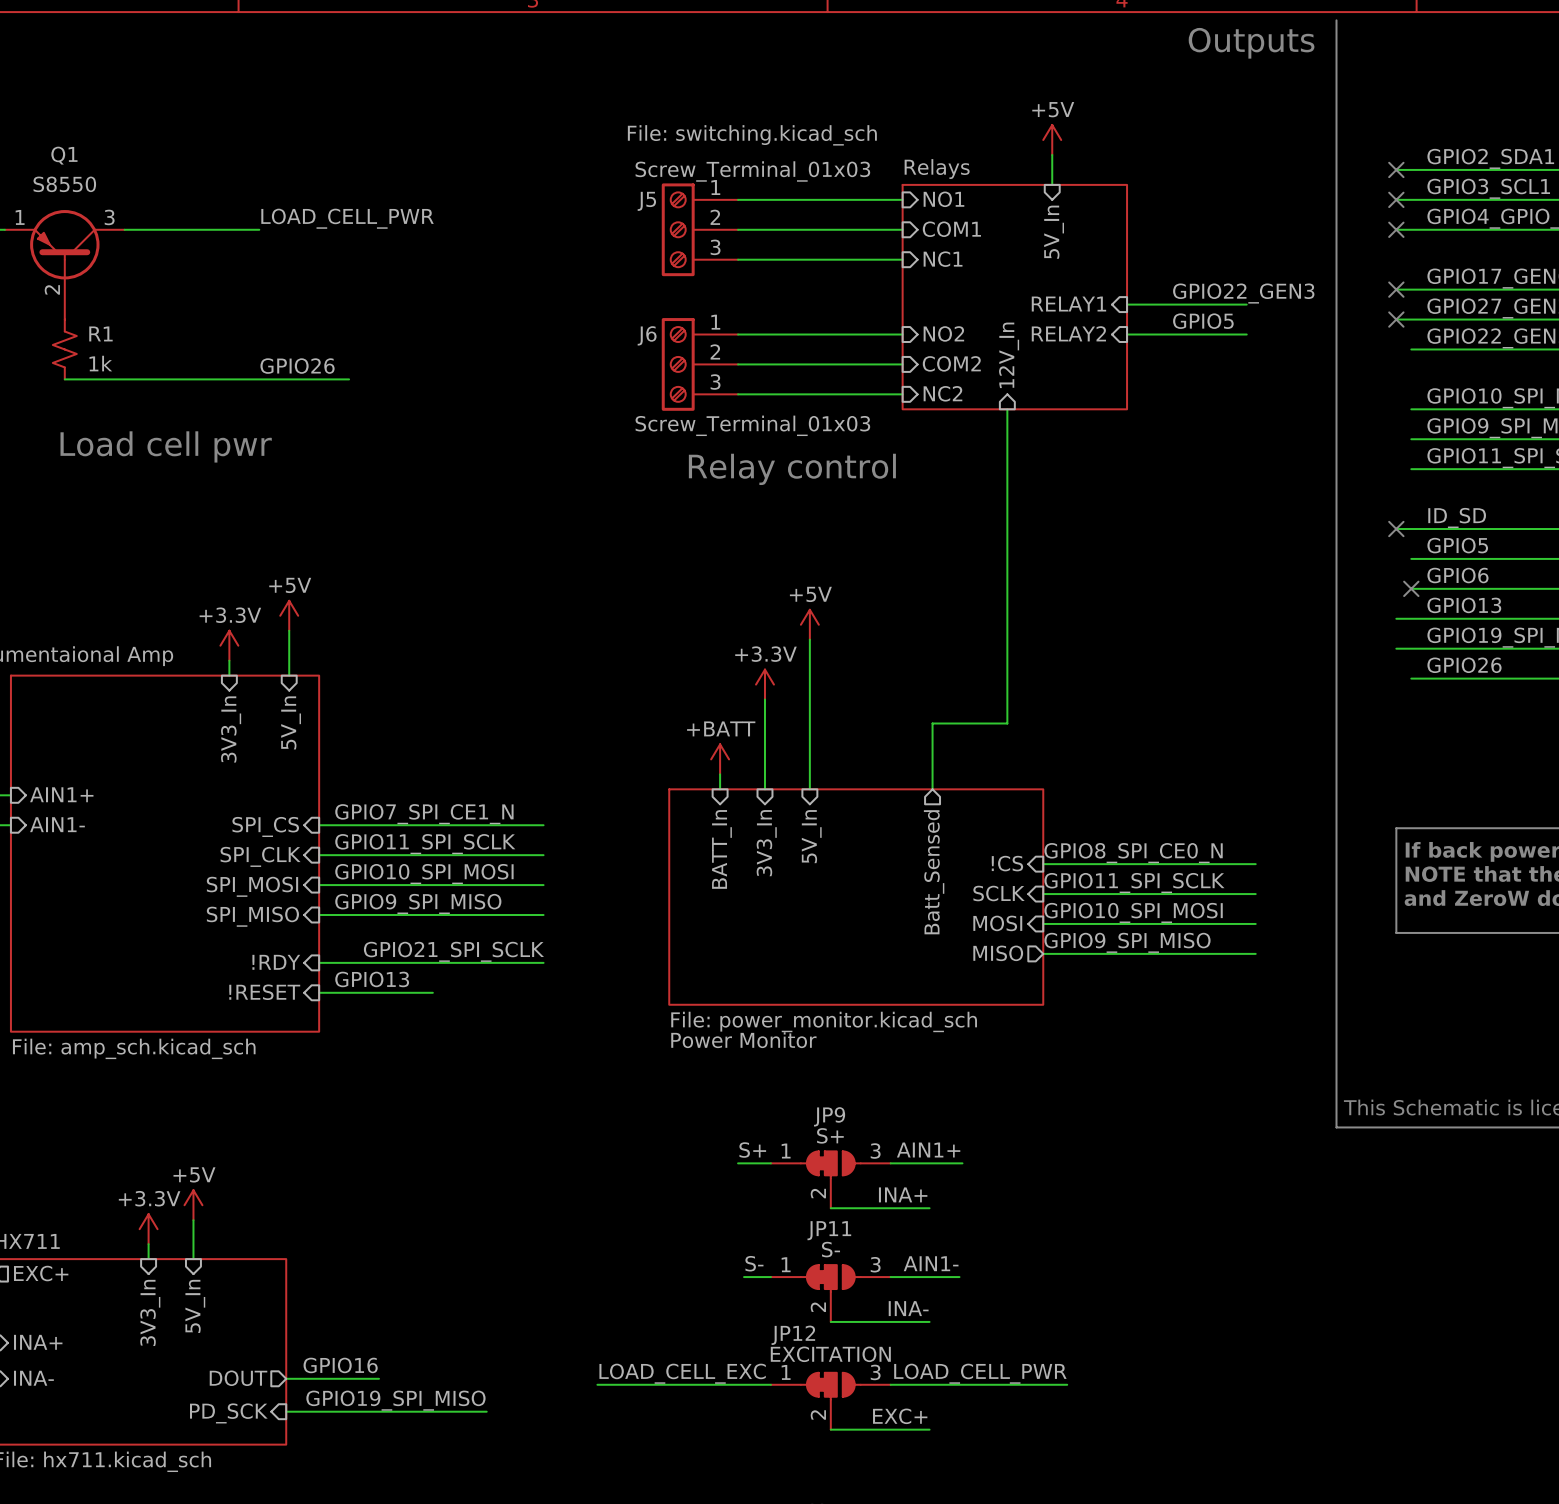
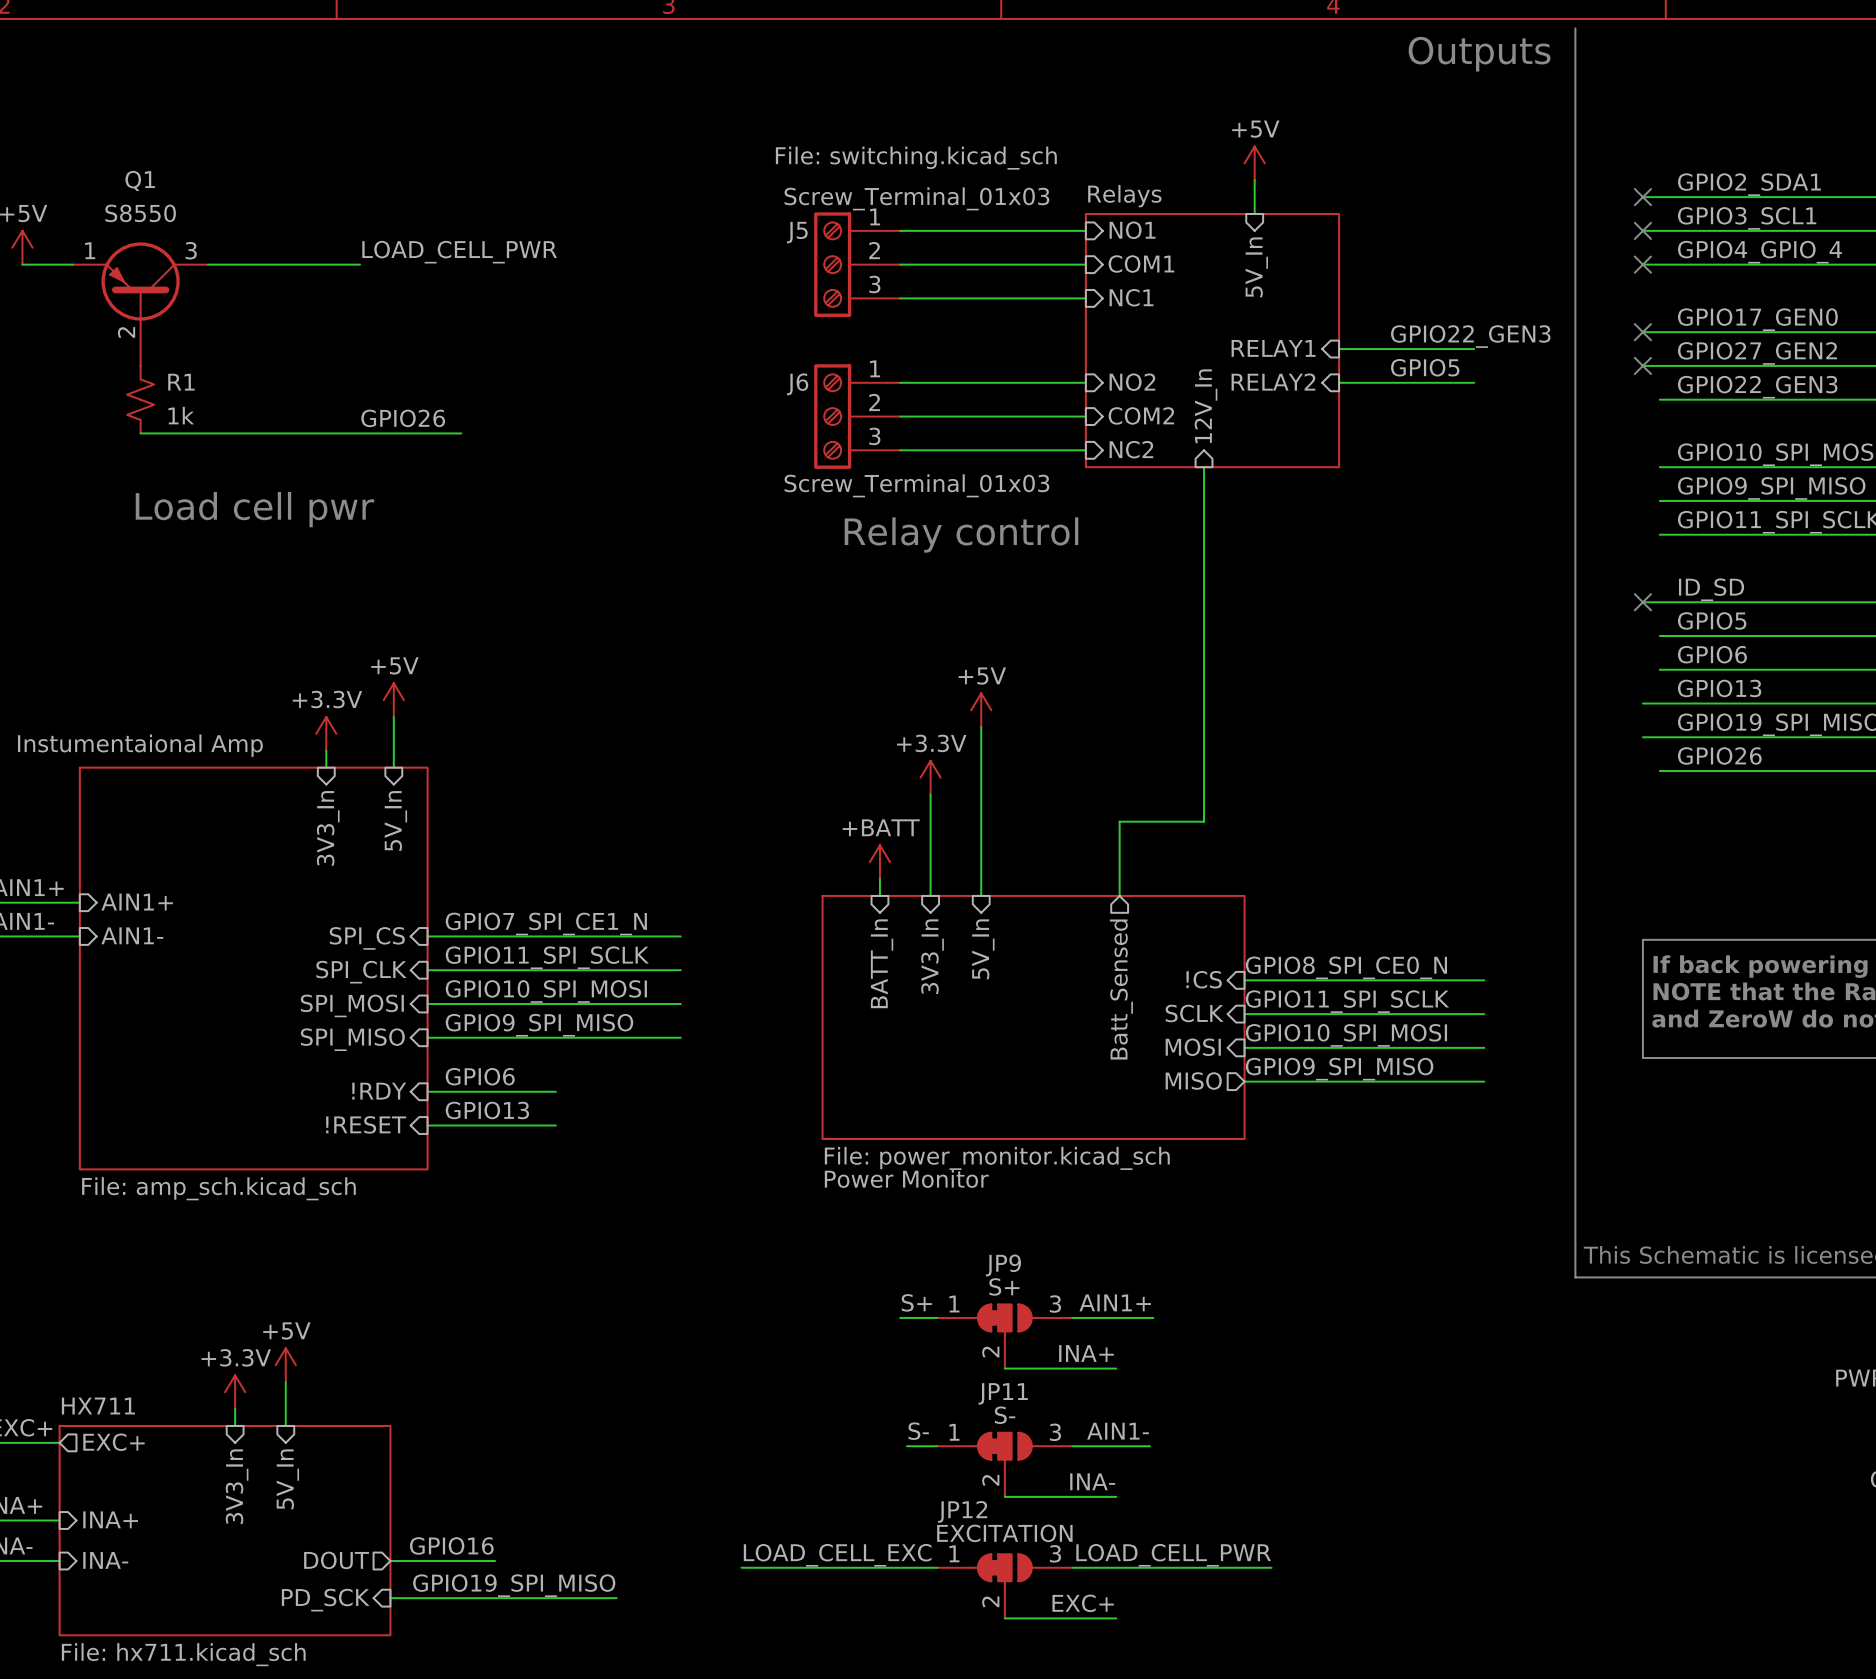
no-connect mark: (1411, 588) -> none
label: none -> GPIO6 (480, 1076)
label: GPIO21_SPI_SCLK (453, 951) -> none
wire: (432, 962) (543, 962) -> none

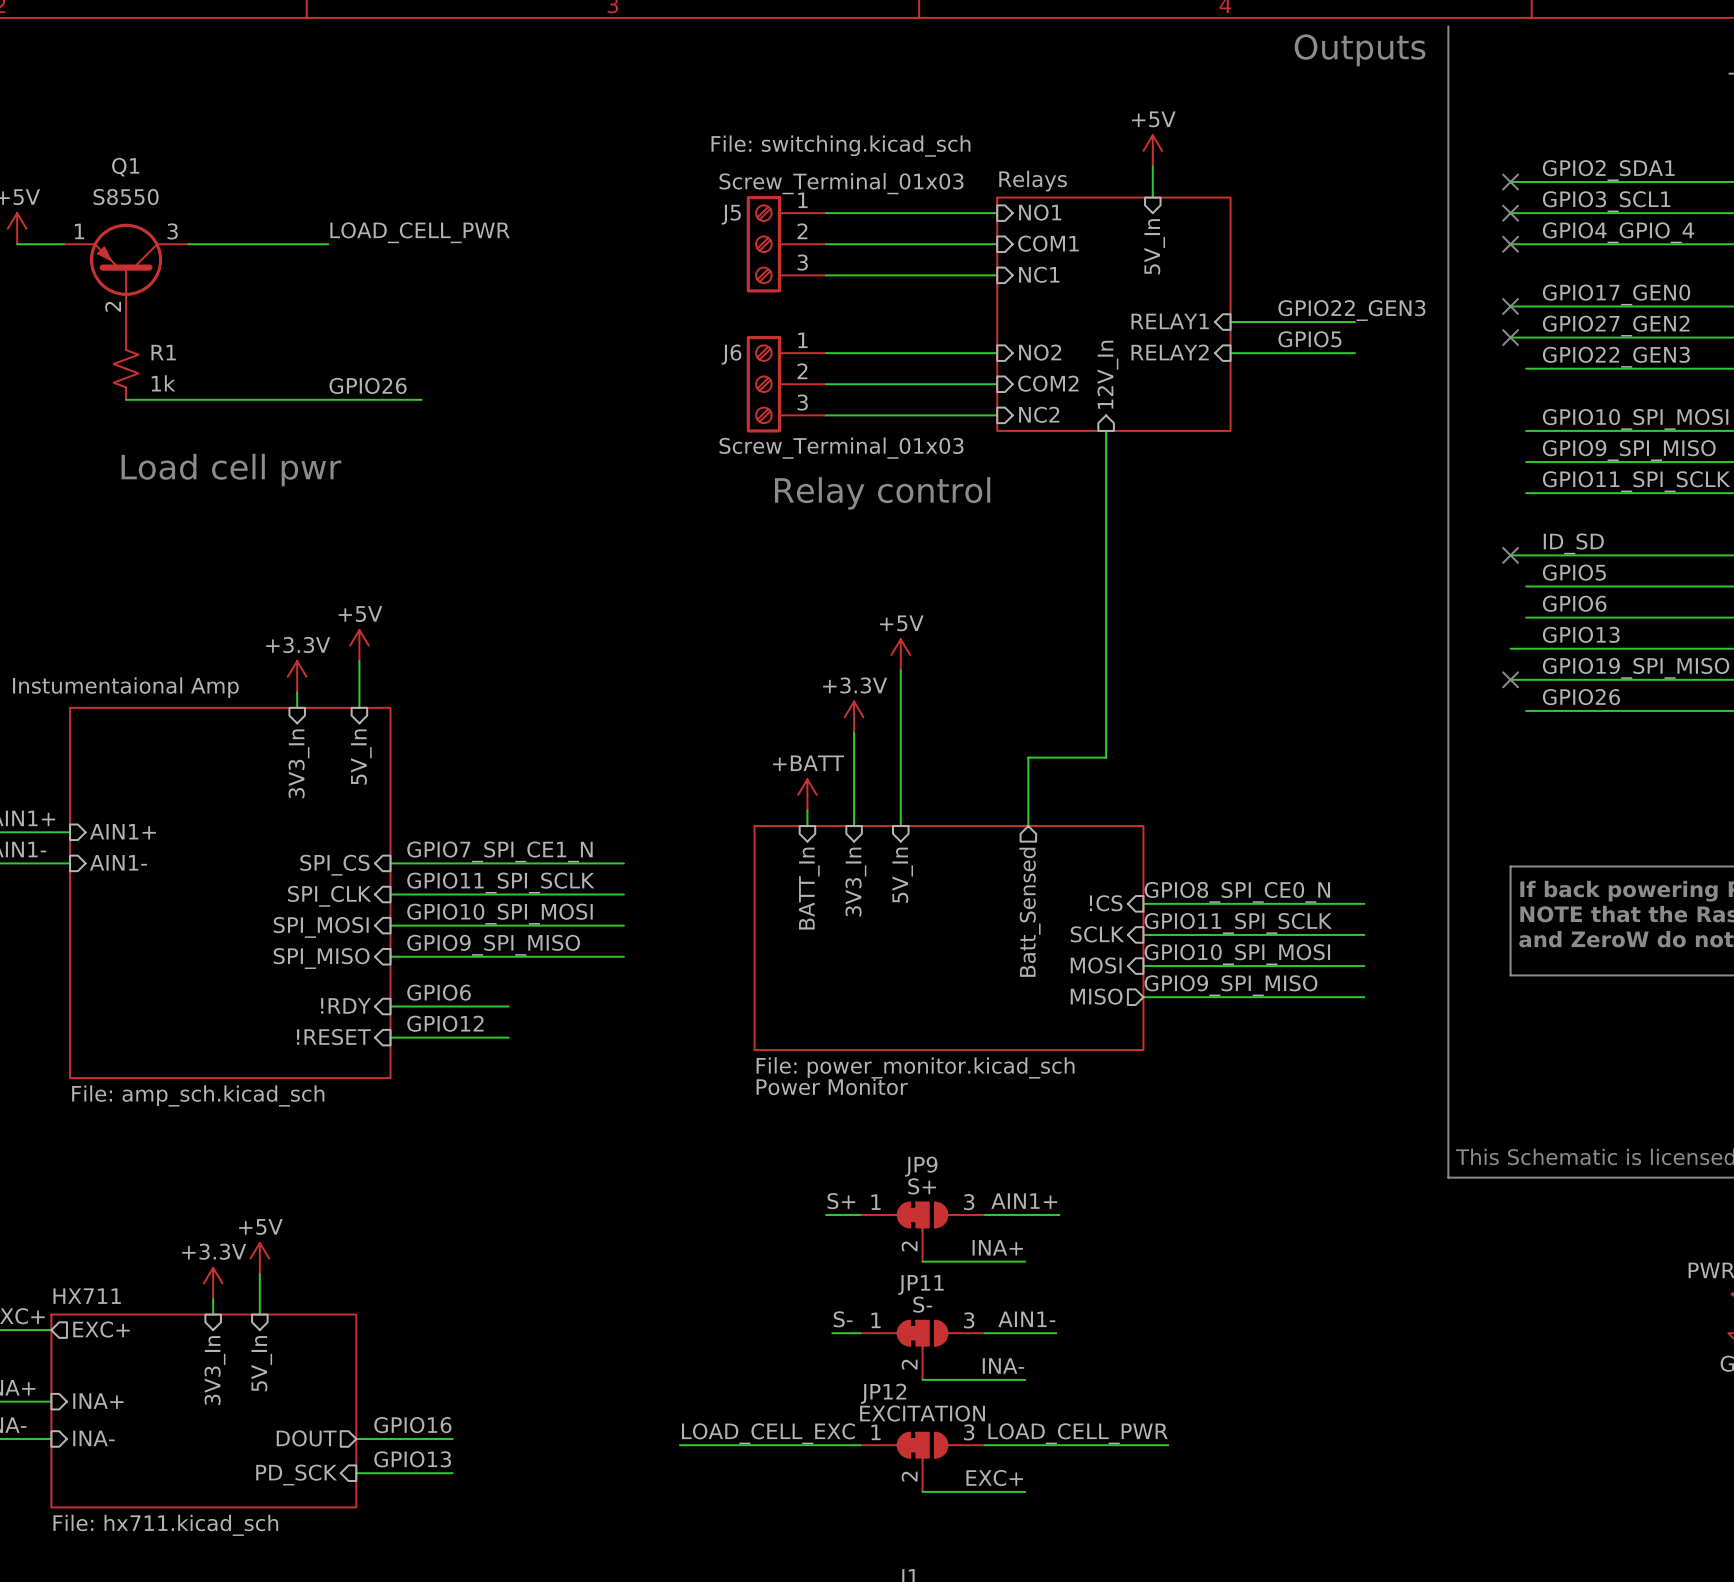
no-connect mark: none -> (1510, 679)
label: GPIO13 (487, 1110) -> GPIO12 (445, 1023)
label: none -> GPIO13 (412, 1459)
label: GPIO19_SPI_MISO (514, 1585) -> none
wire: (495, 1598) (616, 1598) -> none

